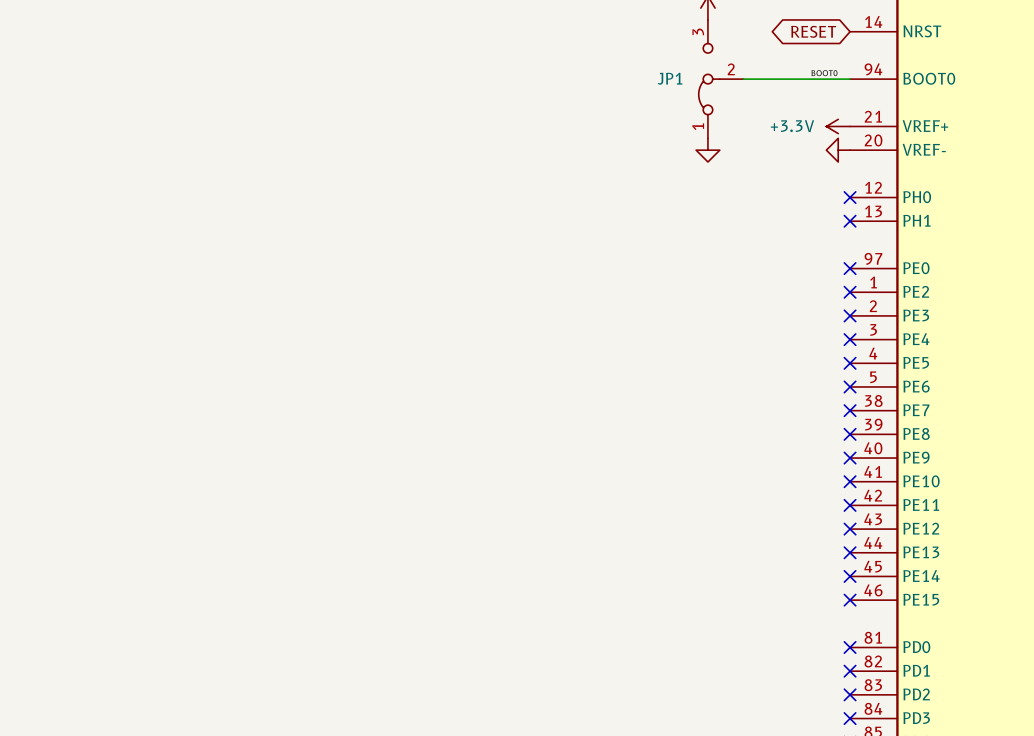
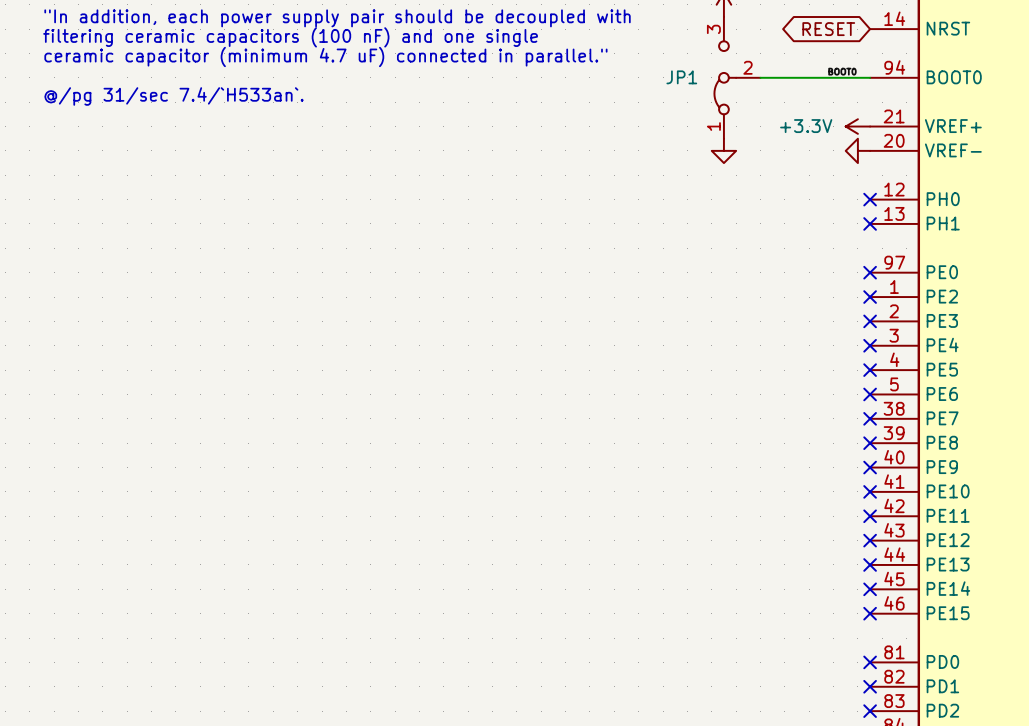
text: none -> "In addition, each power supply pair should be decoupled with (337, 18)
text: none -> filtering ceramic capacitors (100 nF) and one single (290, 37)
text: none -> ceramic capacitor (minimum 4.7 uF) connected in parallel." (325, 56)
text: none -> @/pg 31/sec 7.4/`H533an`. (173, 96)

